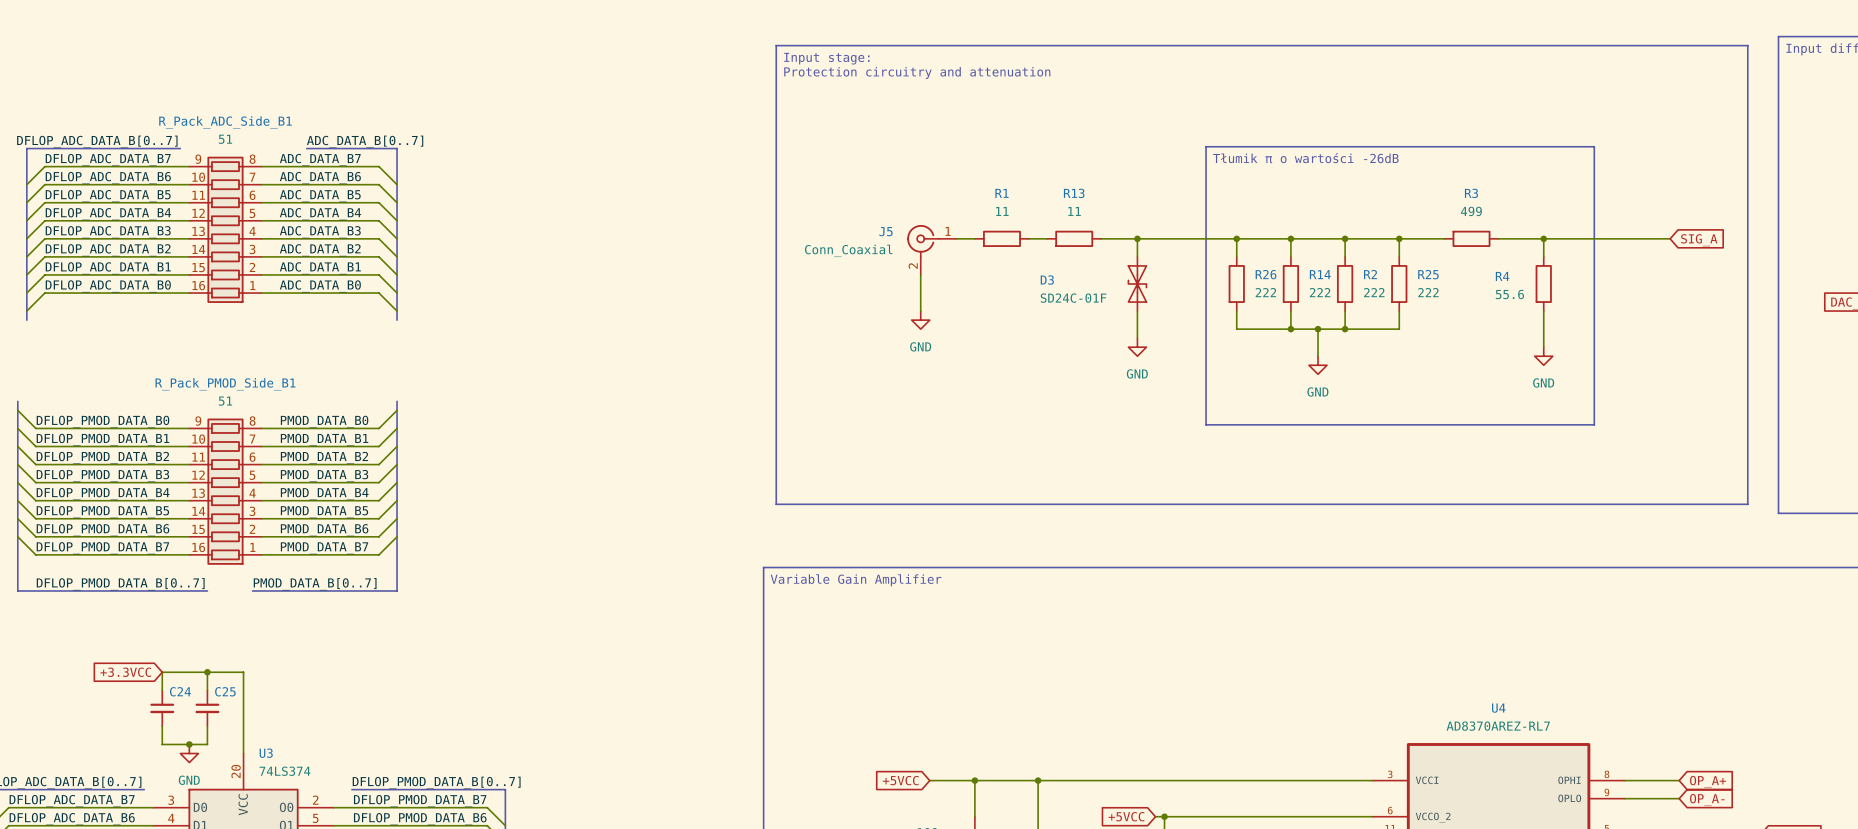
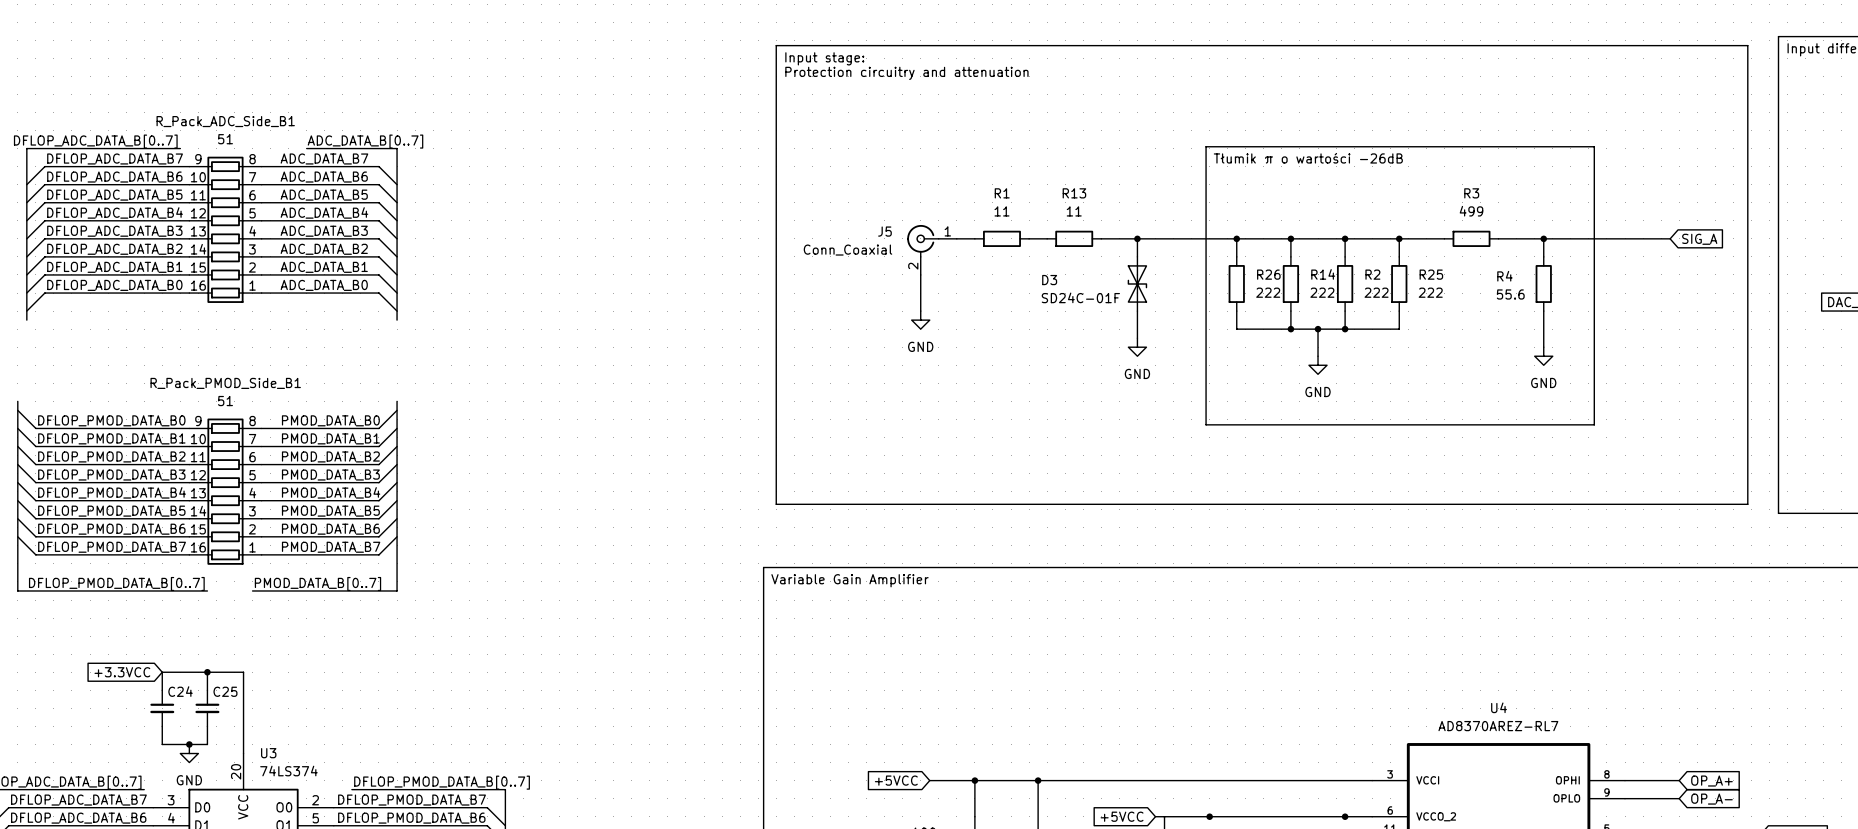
junction: (1164, 816) -> none
junction: none -> (1209, 816)
junction: none -> (1345, 816)

